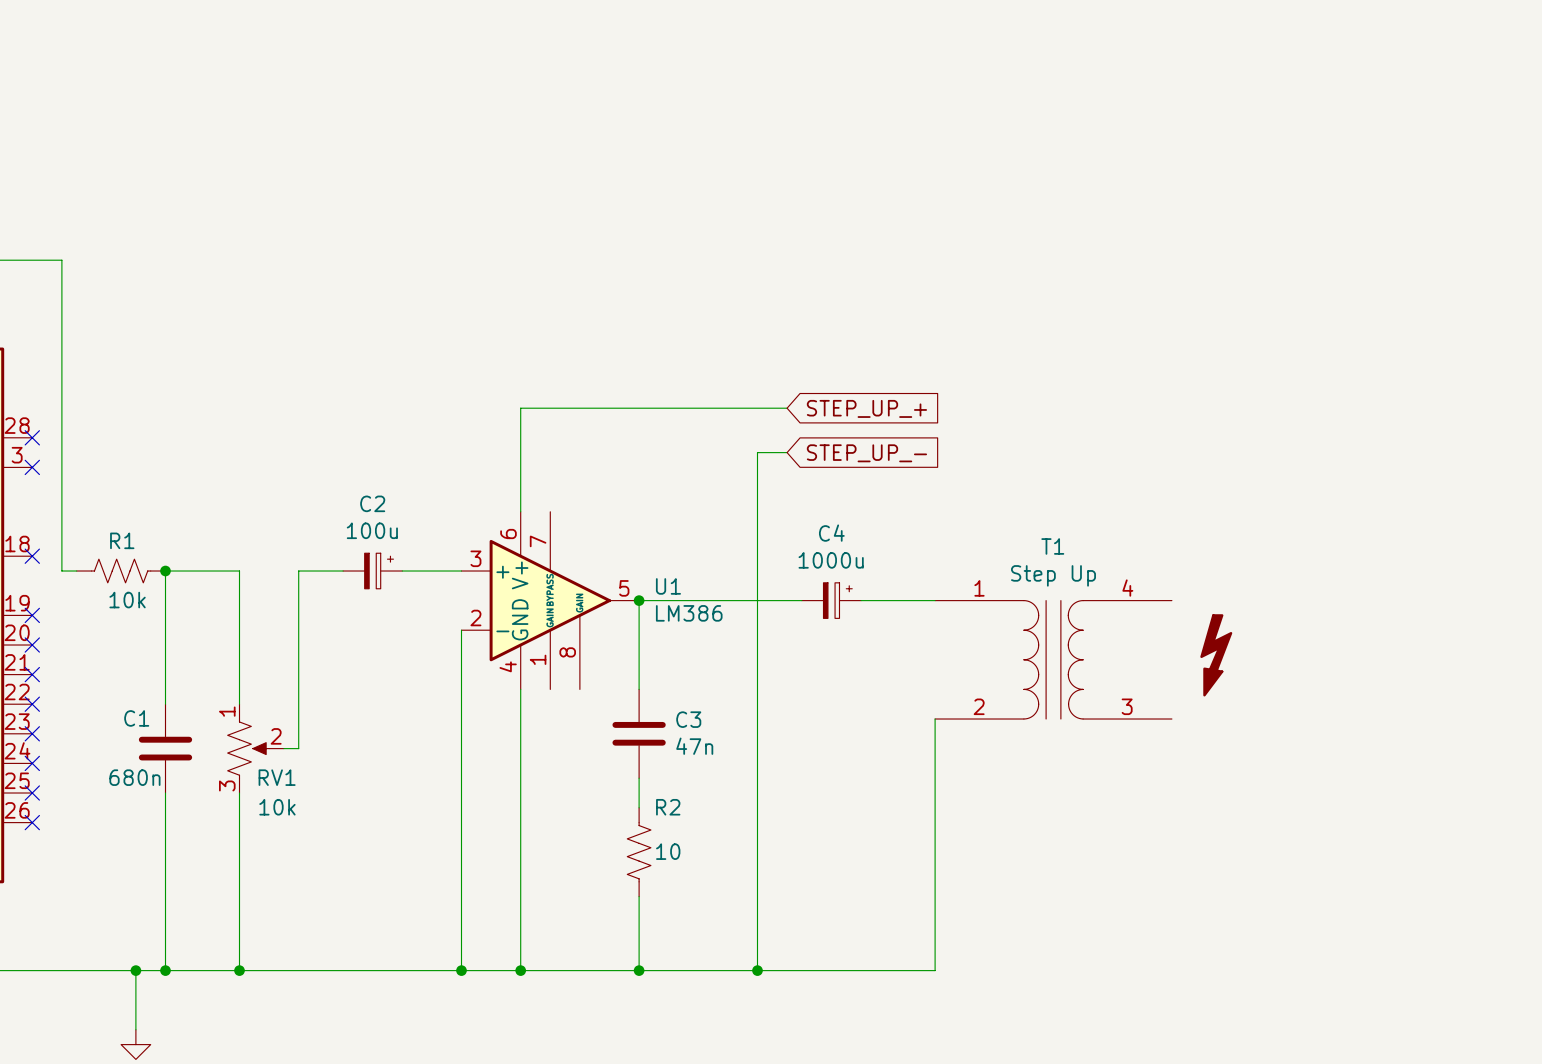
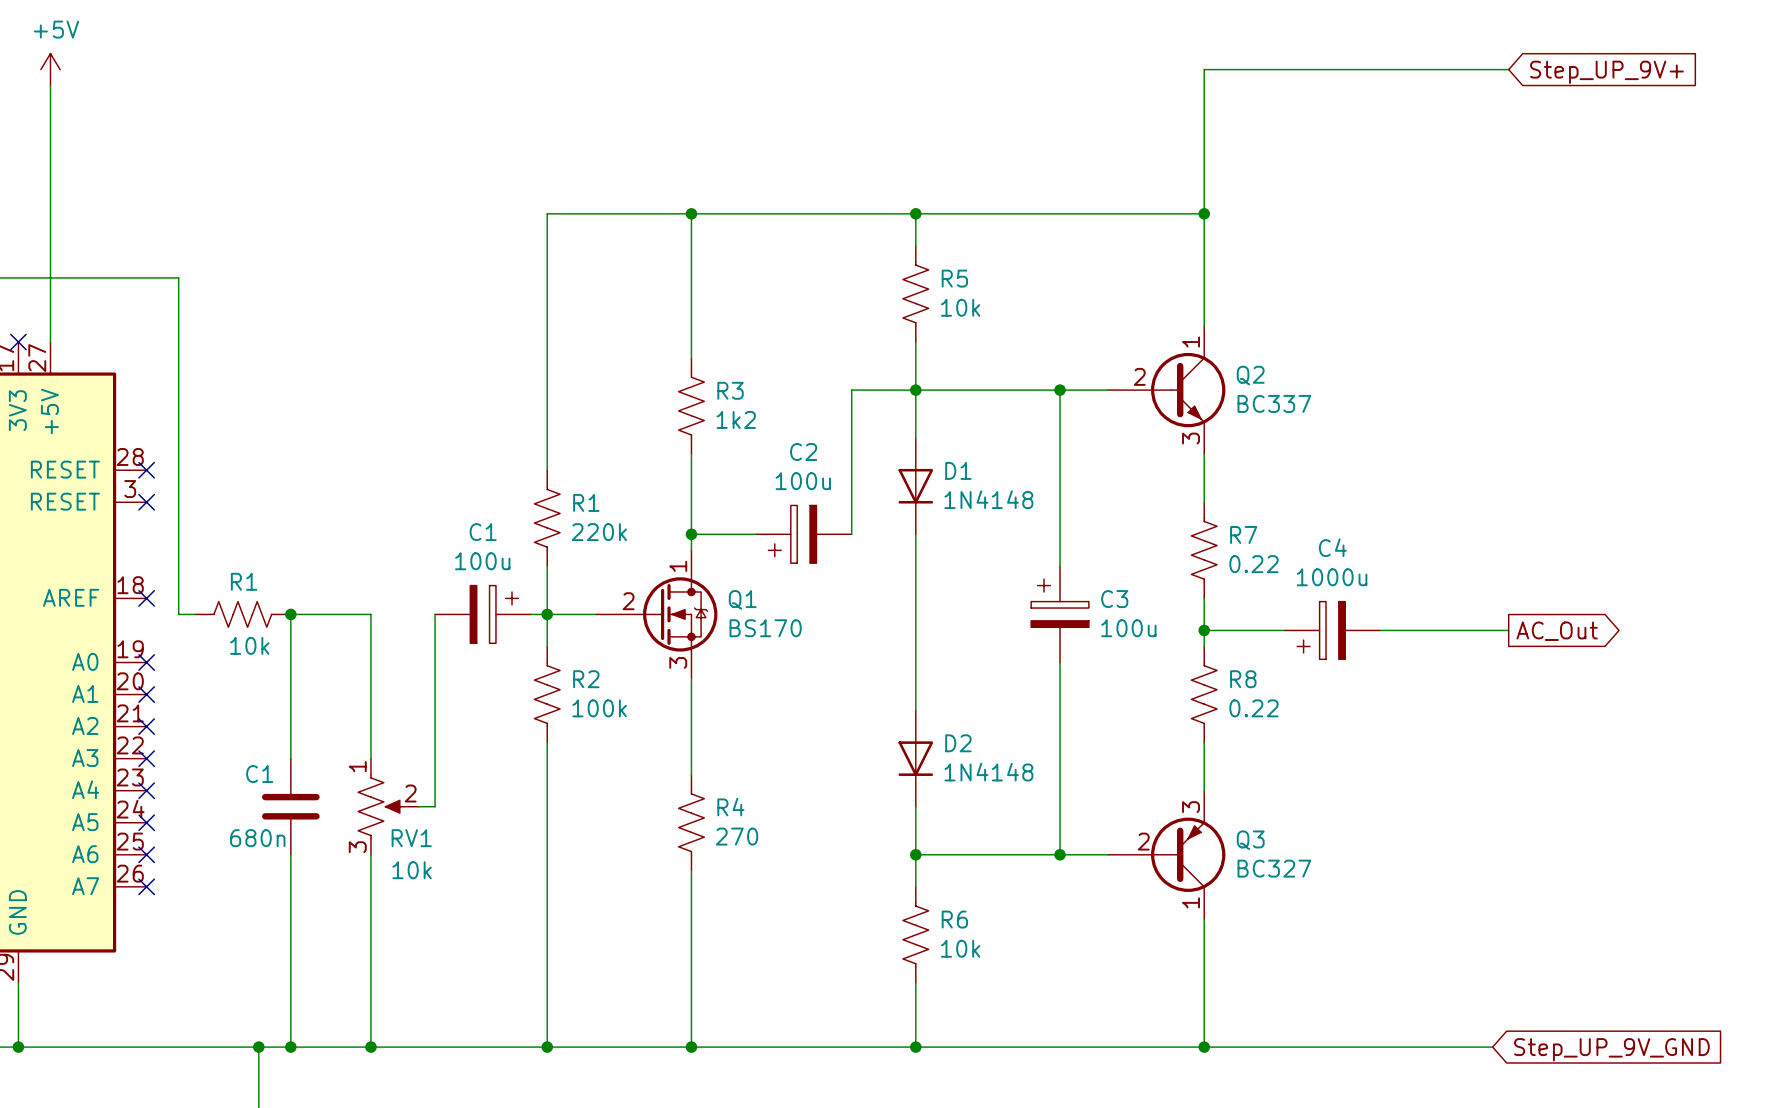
wire: none -> (1508, 69) (1204, 69) (1204, 325)
global label: none -> Step_UP_9V+ (1606, 72)
wire: none -> (691, 213) (691, 358)
junction: none -> (691, 213)
wire: none -> (915, 213) (915, 245)
junction: none -> (915, 213)
wire: none -> (1204, 213) (547, 213) (547, 470)
junction: none -> (1204, 213)
R5: none -> 10k (915, 293)
wire: none -> (915, 342) (915, 438)
junction: none -> (915, 390)
wire: none -> (1060, 390) (1060, 566)
junction: none -> (1060, 390)
wire: none -> (1108, 390) (851, 390) (851, 534)
Q2: none -> BC337 (1166, 390)
R3: none -> 1k2 (691, 406)
wire: (787, 408) (520, 408) (520, 511) -> none
global label: STEP_UP_+ (866, 408) -> none
wire: none -> (691, 454) (691, 550)
wire: none -> (1204, 454) (1204, 502)
D1: none -> 1N4148 (915, 486)
wire: (787, 452) (757, 452) (757, 970) -> none
global label: STEP_UP_- (866, 453) -> none
R1: none -> 220k (547, 518)
wire: none -> (691, 534) (755, 534)
junction: none -> (691, 534)
wire: none -> (915, 534) (915, 710)
R7: none -> 0.22 (1204, 550)
wire: none -> (547, 566) (547, 646)
C2 symbol: [343, 553, 403, 589] -> [755, 505, 852, 564]
wire: none -> (1204, 598) (1204, 646)
C1: none -> 100u (483, 614)
junction: none -> (547, 614)
Q1: none -> BS170 (656, 614)
C4 symbol: [801, 582, 862, 619] -> [1284, 601, 1381, 660]
junction: none -> (1204, 630)
wire: none -> (1380, 630) (1508, 630)
global label: none -> AC_Out (1557, 631)
U1: LM386 (550, 600) -> none
junction: (639, 600) -> none
wire: (801, 600) (639, 600) (639, 689) -> none
wire: (861, 600) (935, 600) -> (1204, 630) (1284, 630)
wire: none -> (1060, 662) (1060, 854)
wire: (461, 630) (461, 970) -> none
wire: none -> (691, 678) (691, 774)
R8: none -> 0.22 (1204, 694)
power symbol: (1216, 655) -> none
T1: Step Up (1053, 659) -> none
wire: (520, 689) (520, 970) -> (547, 742) (547, 1047)
C3 symbol: [612, 689, 666, 779] -> [1031, 566, 1089, 663]
wire: none -> (1204, 742) (1204, 790)
D2: none -> 1N4148 (915, 758)
wire: (935, 719) (935, 970) -> (1492, 1047) (1124, 1047)
C3 value: 47n (694, 746) -> 100u (1128, 628)
R4: none -> 270 (691, 822)
wire: (639, 778) (639, 807) -> none
wire: none -> (915, 854) (1108, 854)
junction: none -> (915, 854)
junction: none -> (1060, 854)
Q3: none -> BC327 (1166, 854)
wire: none -> (691, 870) (691, 1047)
R2 name position: R2 (668, 807) -> R2 (586, 679)
R2 value: 10 (668, 851) -> 100k (599, 708)
R2 position: (639, 852) -> (547, 694)
wire: none -> (1204, 918) (1204, 1047)
R6: none -> 10k (915, 934)
wire: (639, 896) (639, 970) -> (915, 806) (915, 886)
wire: none -> (915, 982) (915, 1047)
junction: none -> (547, 1047)
junction: (461, 970) -> none
junction position: (520, 970) -> (691, 1047)
junction: (639, 970) -> none
junction position: (757, 970) -> (915, 1047)
junction: none -> (1204, 1047)
global label: none -> Step_UP_9V_GND (1611, 1049)

